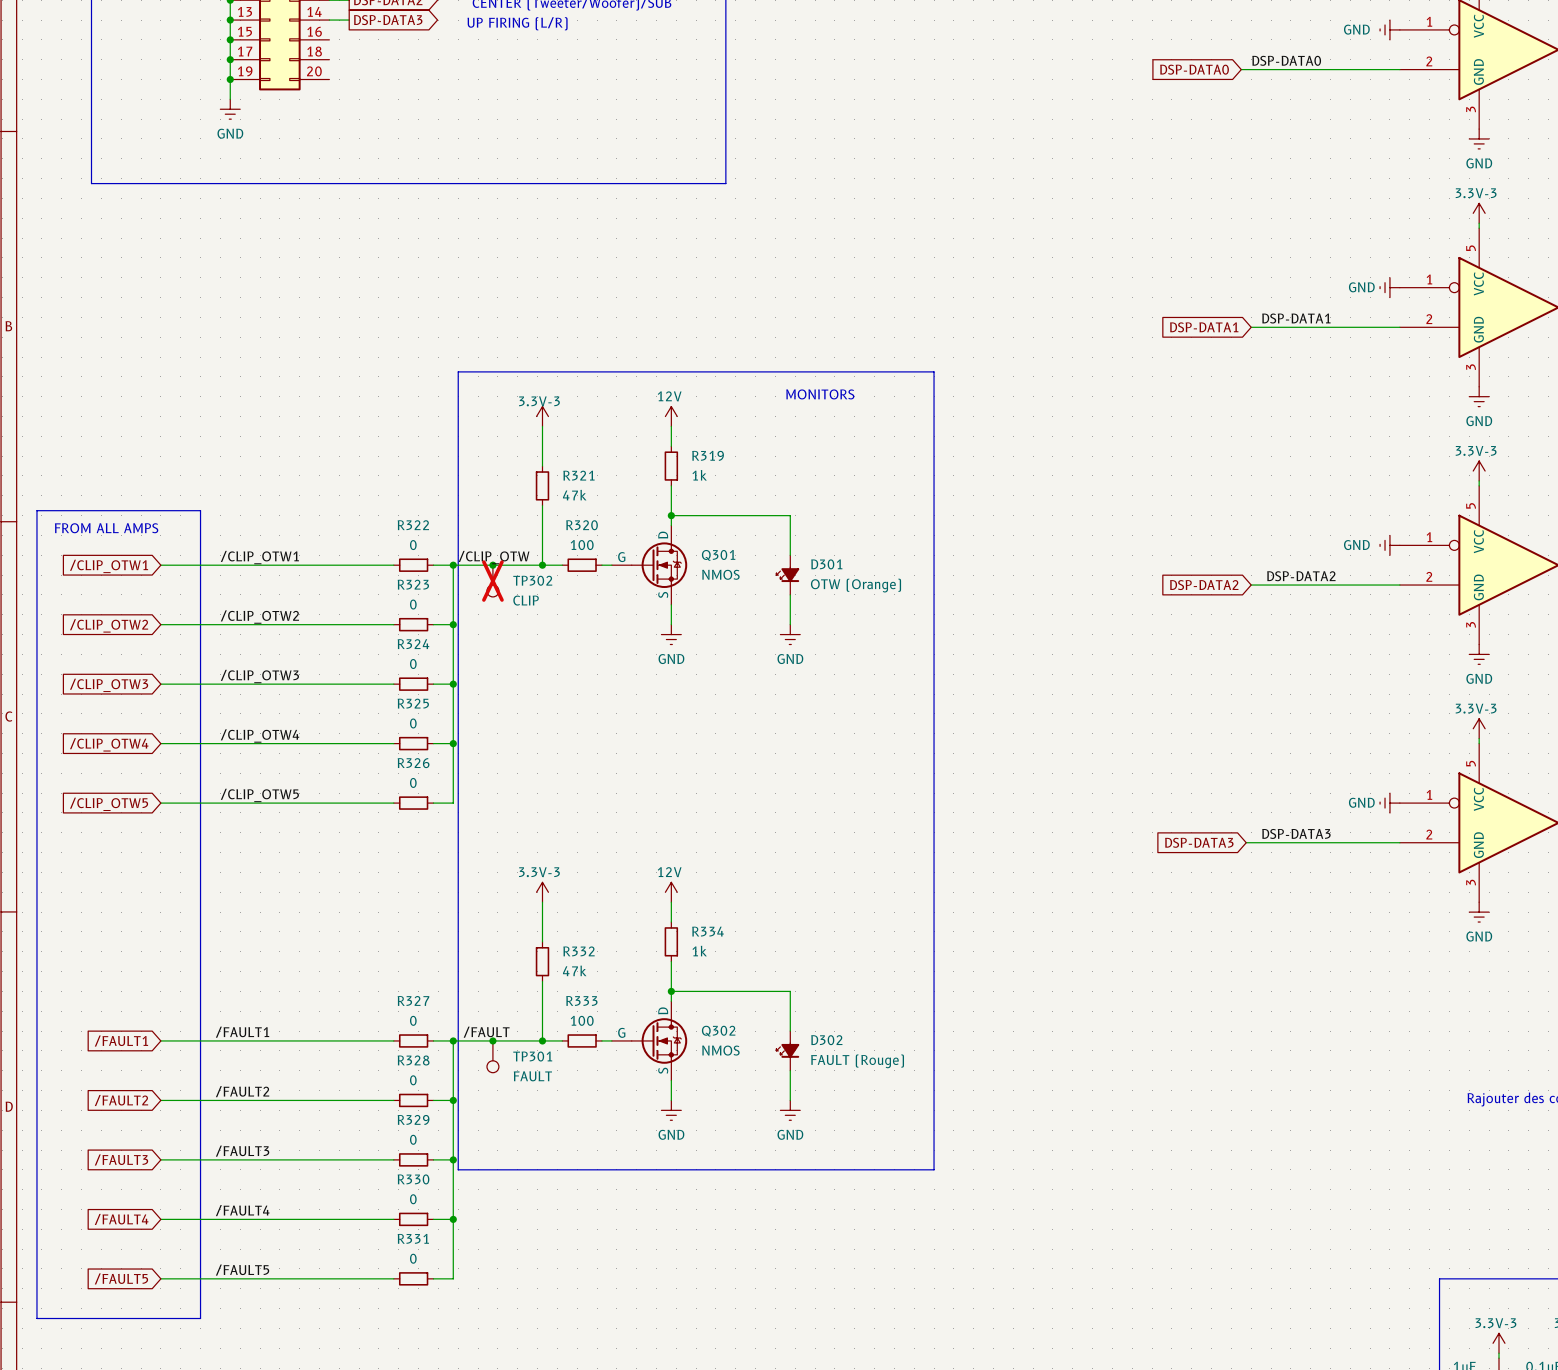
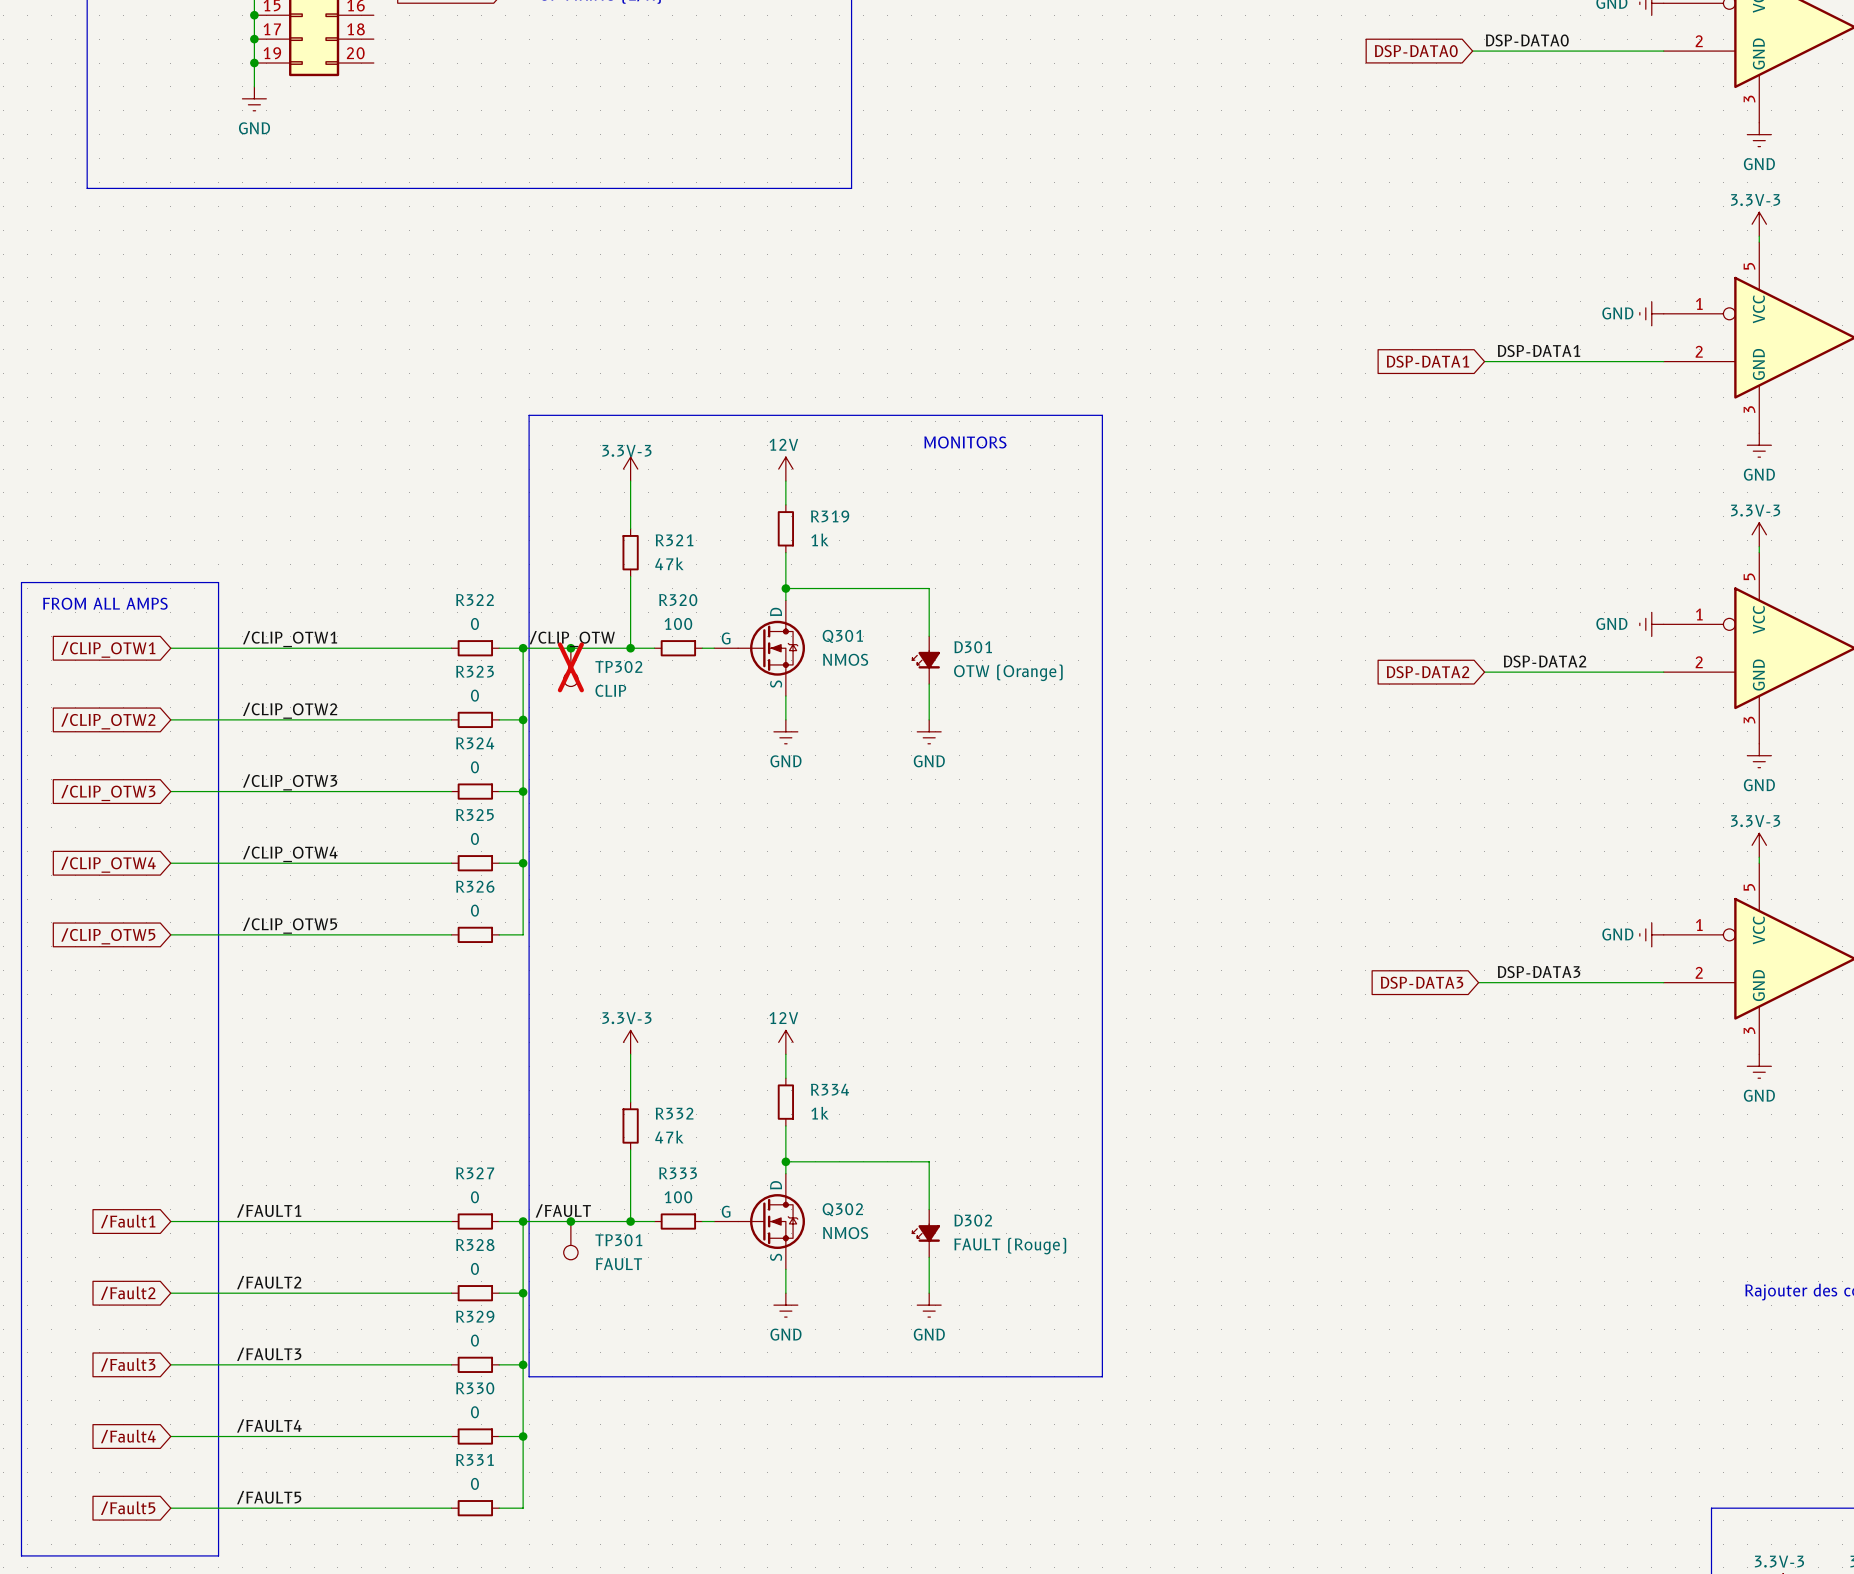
global label: /FAULT1 (121, 1041) -> /Fault1 (128, 1221)
global label: /FAULT2 (121, 1100) -> /Fault2 (128, 1293)
global label: /FAULT3 (121, 1159) -> /Fault3 (128, 1364)
global label: /FAULT4 (121, 1219) -> /Fault4 (128, 1436)
global label: /FAULT5 (121, 1278) -> /Fault5 (128, 1508)

